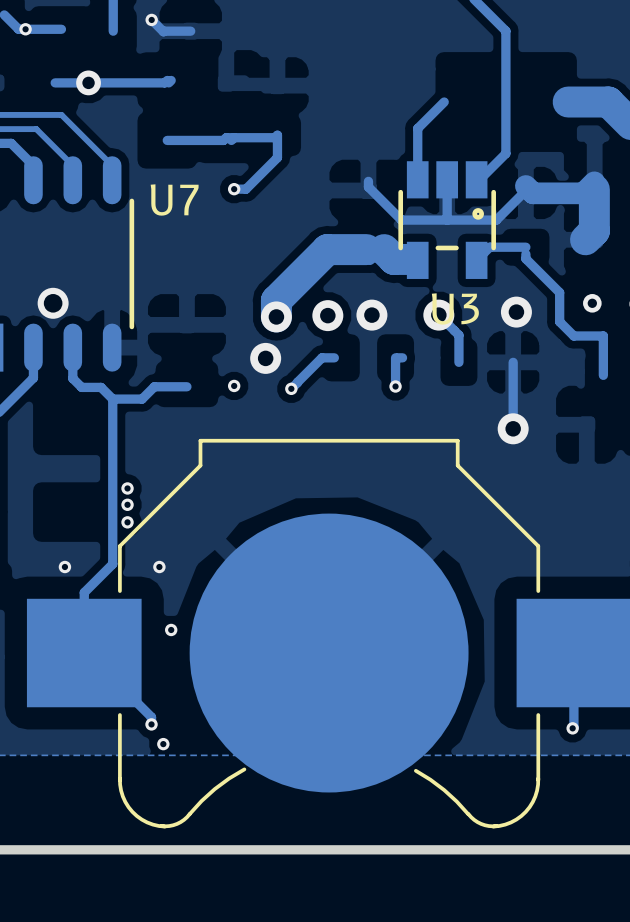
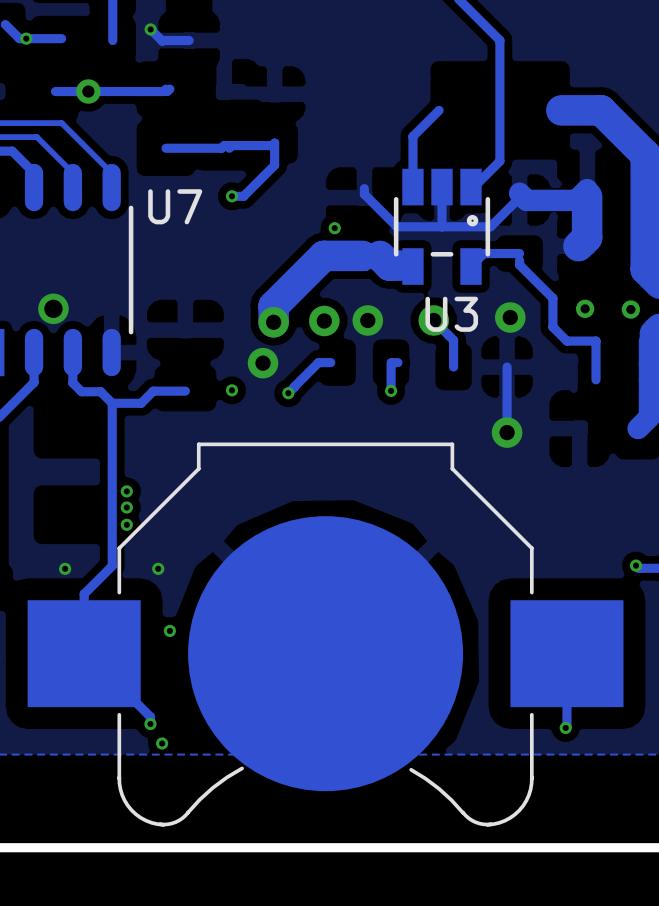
via: none -> (334, 228)

